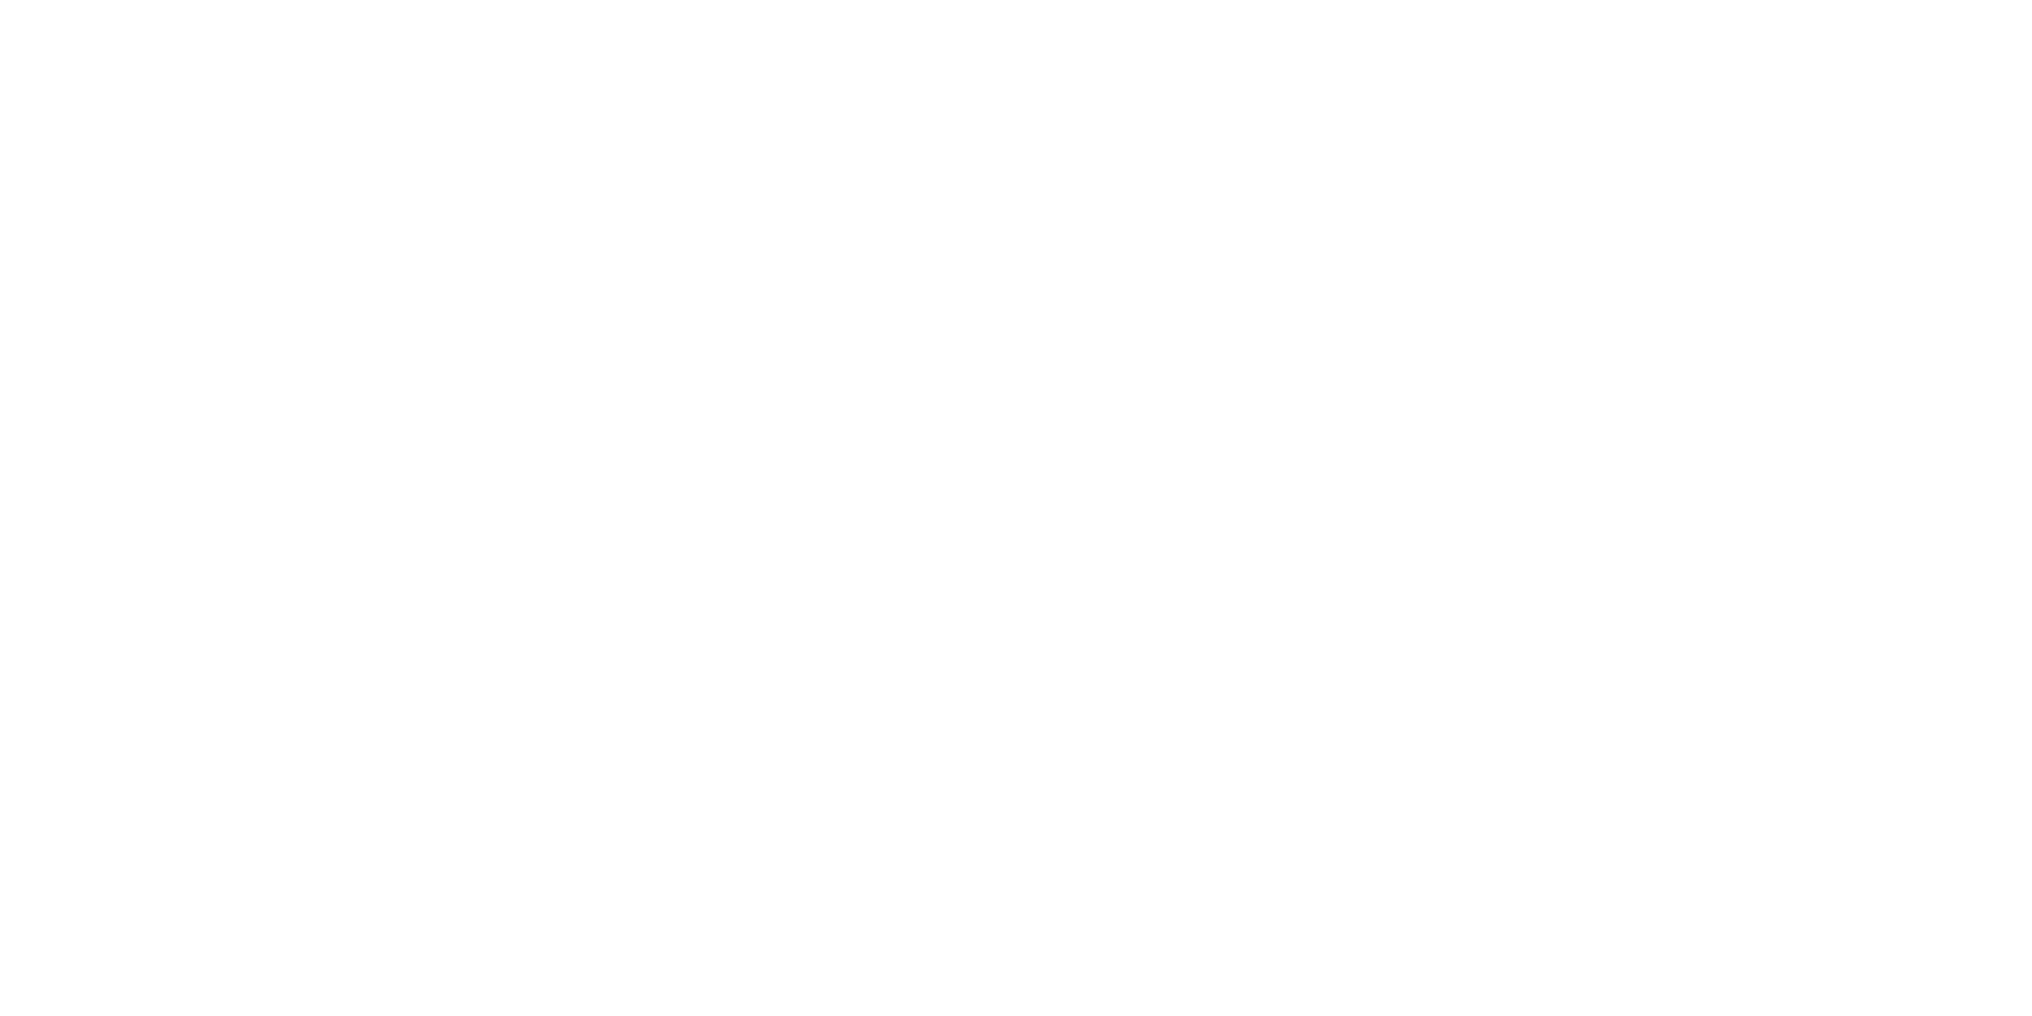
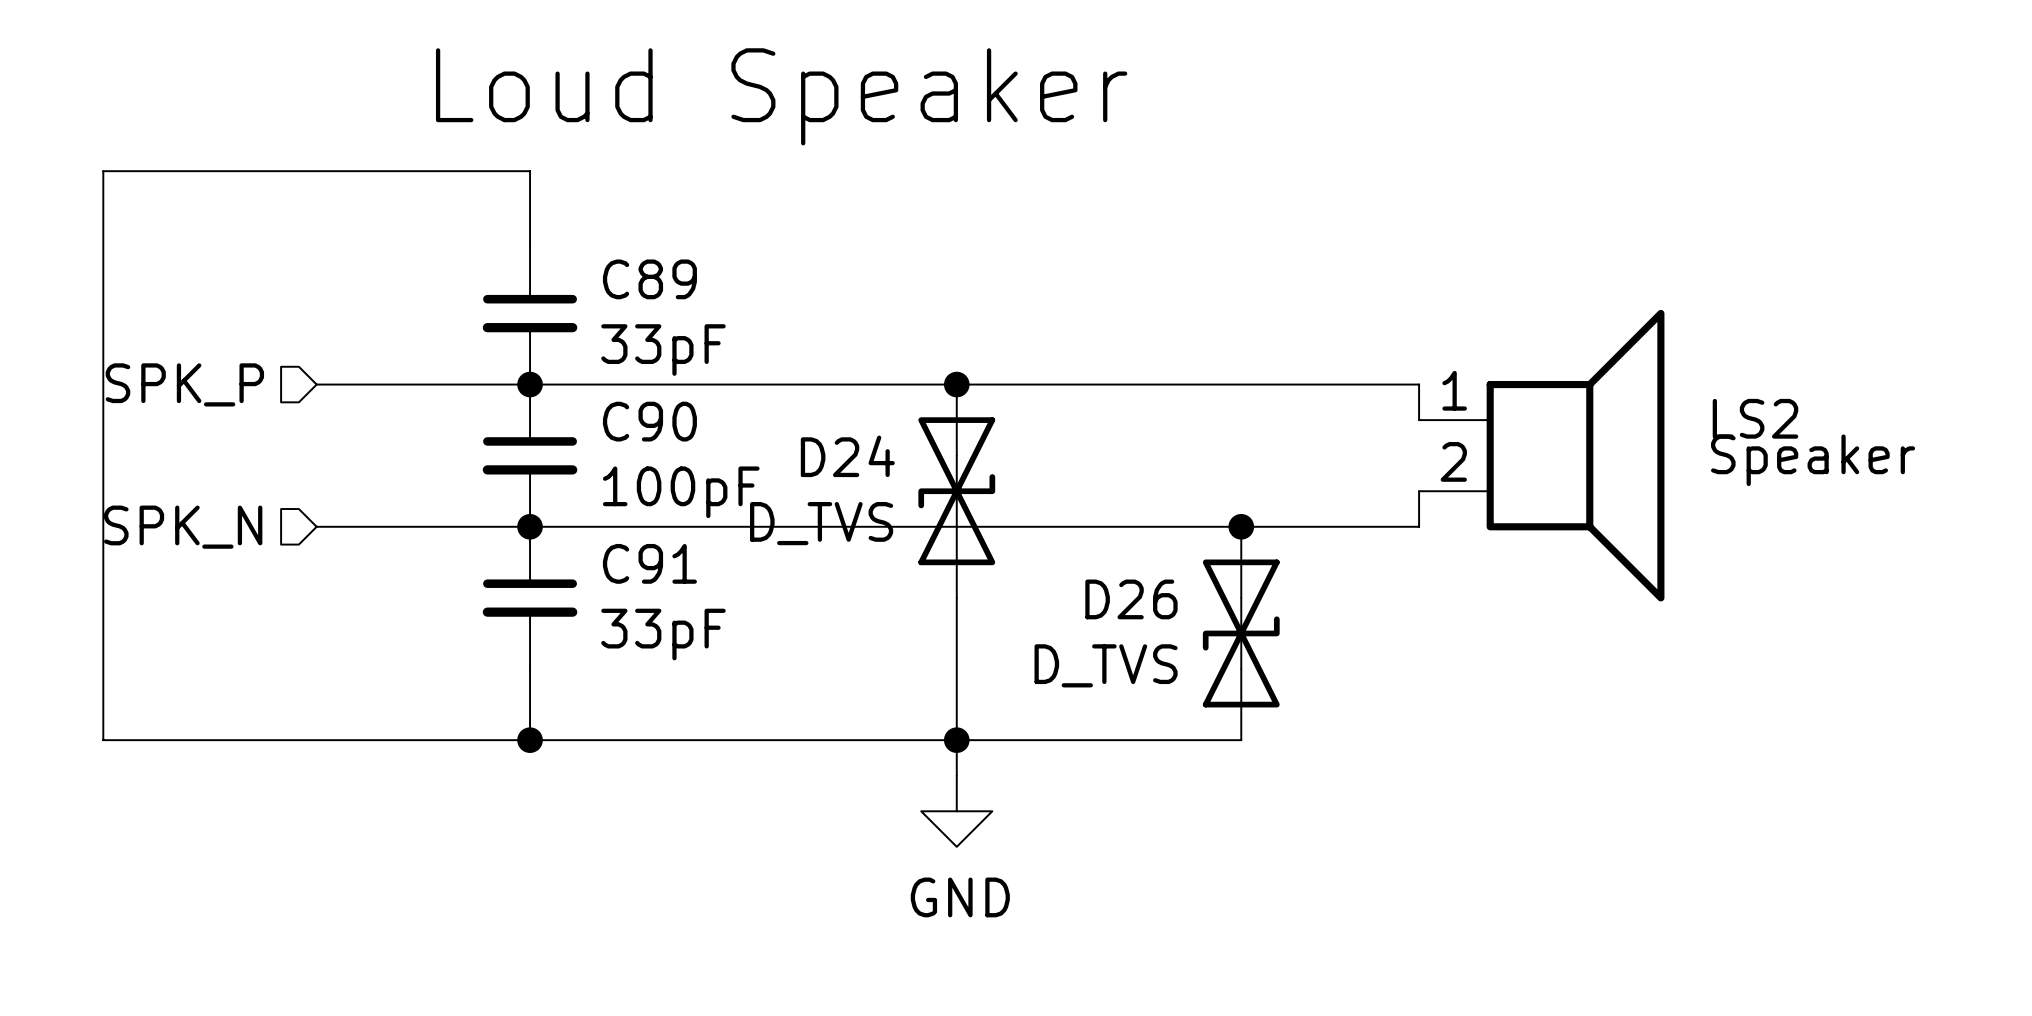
text: none -> Loud Speaker (781, 96)
wire: none -> (530, 242) (530, 171) (103, 171) (103, 740) (1241, 740)
C89: none -> 33pF (530, 313)
hierarchical label: none -> SPK_P (184, 384)
wire: none -> (316, 384) (1419, 384) (1419, 420)
junction: none -> (530, 384)
junction: none -> (956, 384)
C90: none -> 100pF (530, 455)
LS2: none -> Speaker (1541, 455)
D24: none -> D_TVS (956, 491)
wire: none -> (1419, 491) (1419, 526) (316, 526)
junction: none -> (530, 526)
junction: none -> (1241, 526)
hierarchical label: none -> SPK_N (183, 527)
C91: none -> 33pF (530, 597)
wire: none -> (956, 597) (956, 775)
D26: none -> D_TVS (1241, 633)
wire: none -> (530, 669) (530, 740)
junction: none -> (530, 740)
junction: none -> (956, 740)
power symbol: none -> GND (956, 811)

